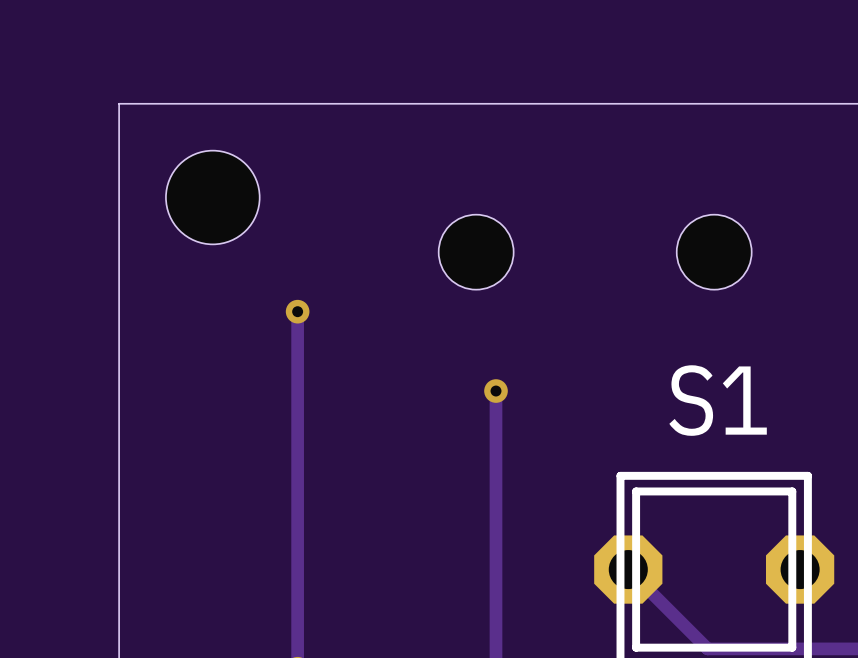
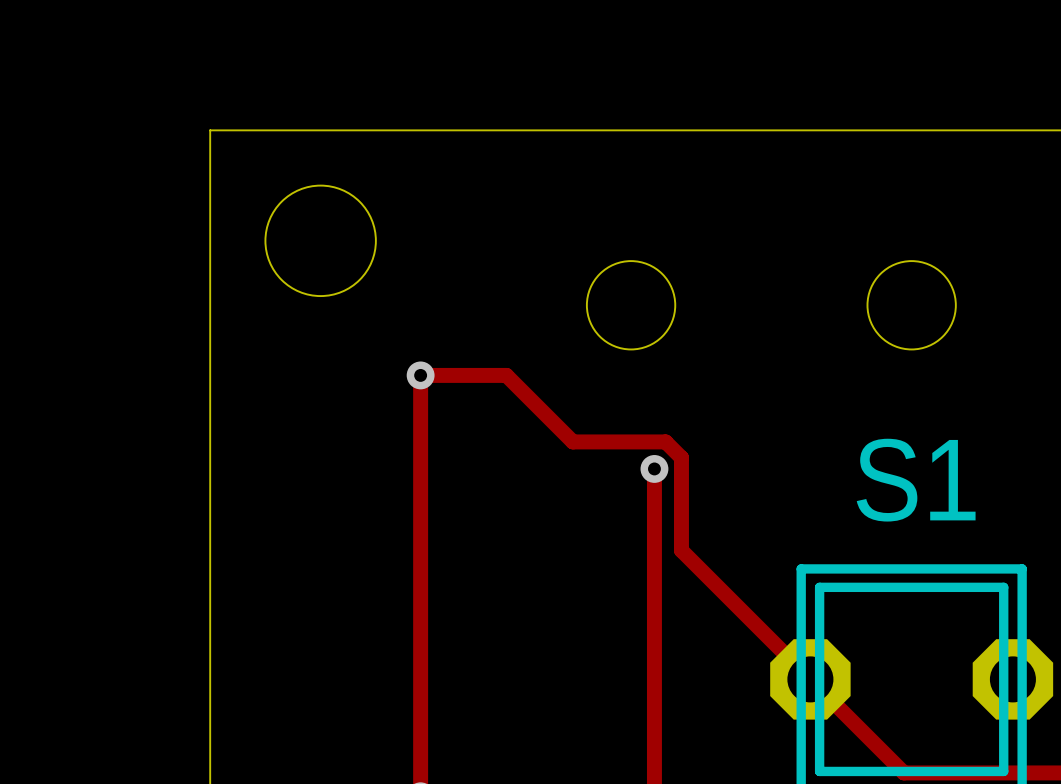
track: none -> (420, 375) (506, 375) (572, 441) (665, 441) (681, 457) (681, 550) (810, 679)

